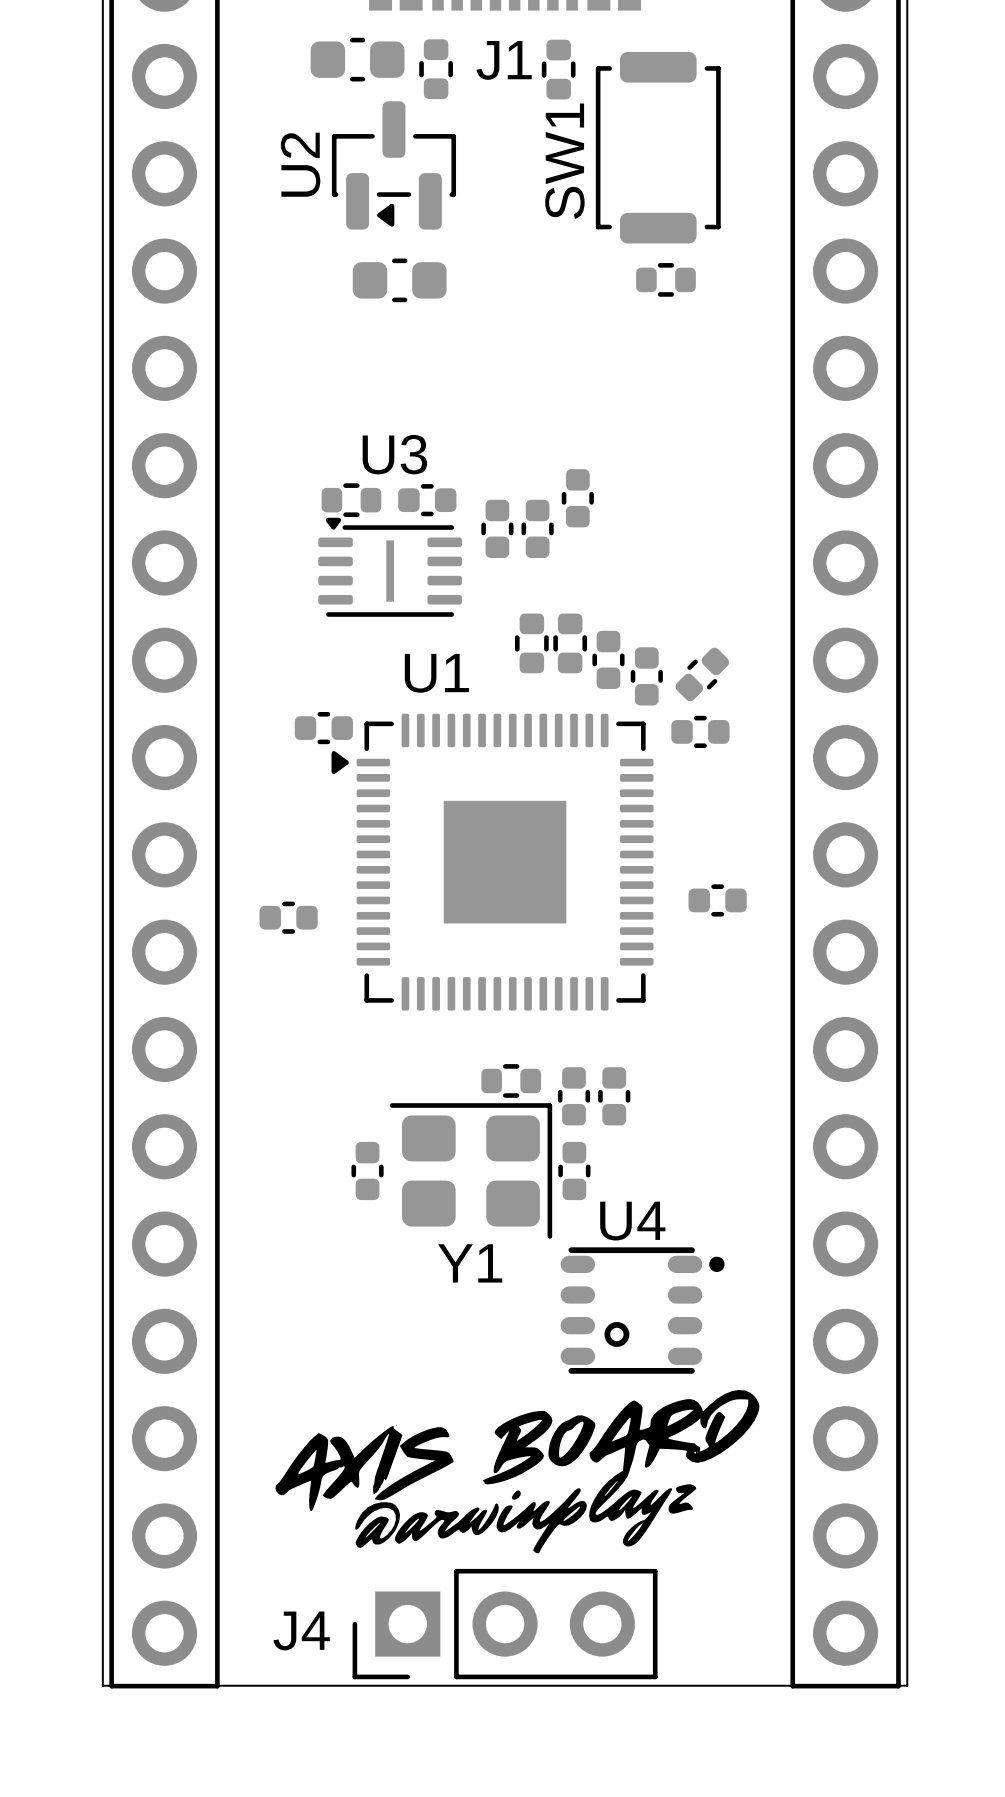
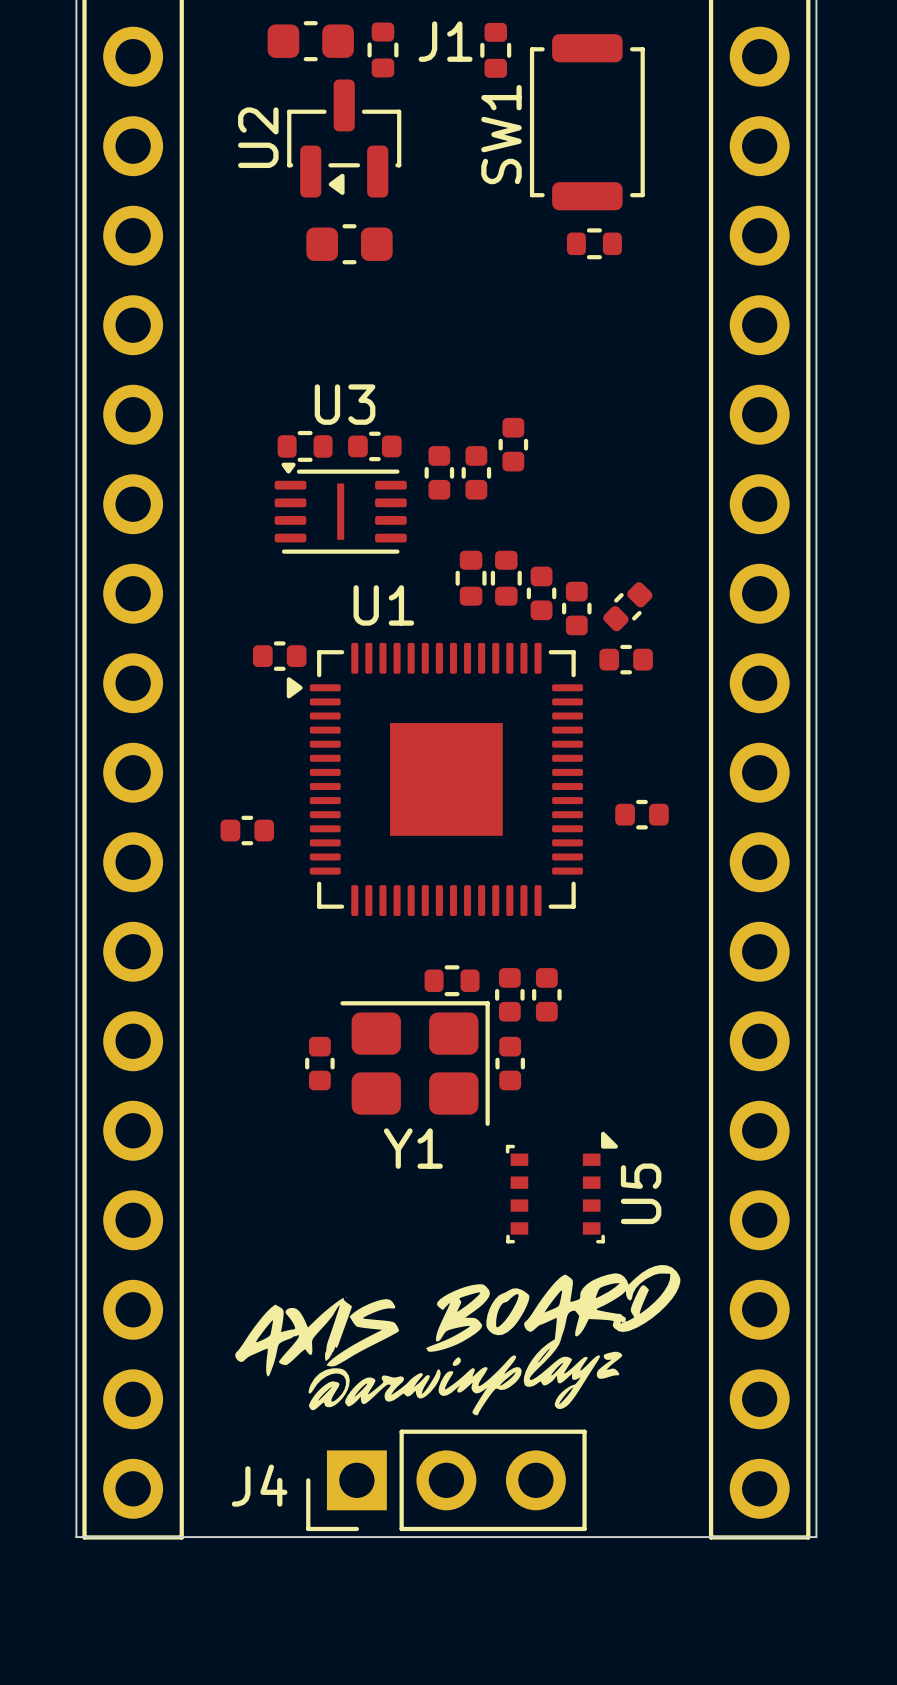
U5: none -> (561, 1187)
U4: (642, 1310) -> none

